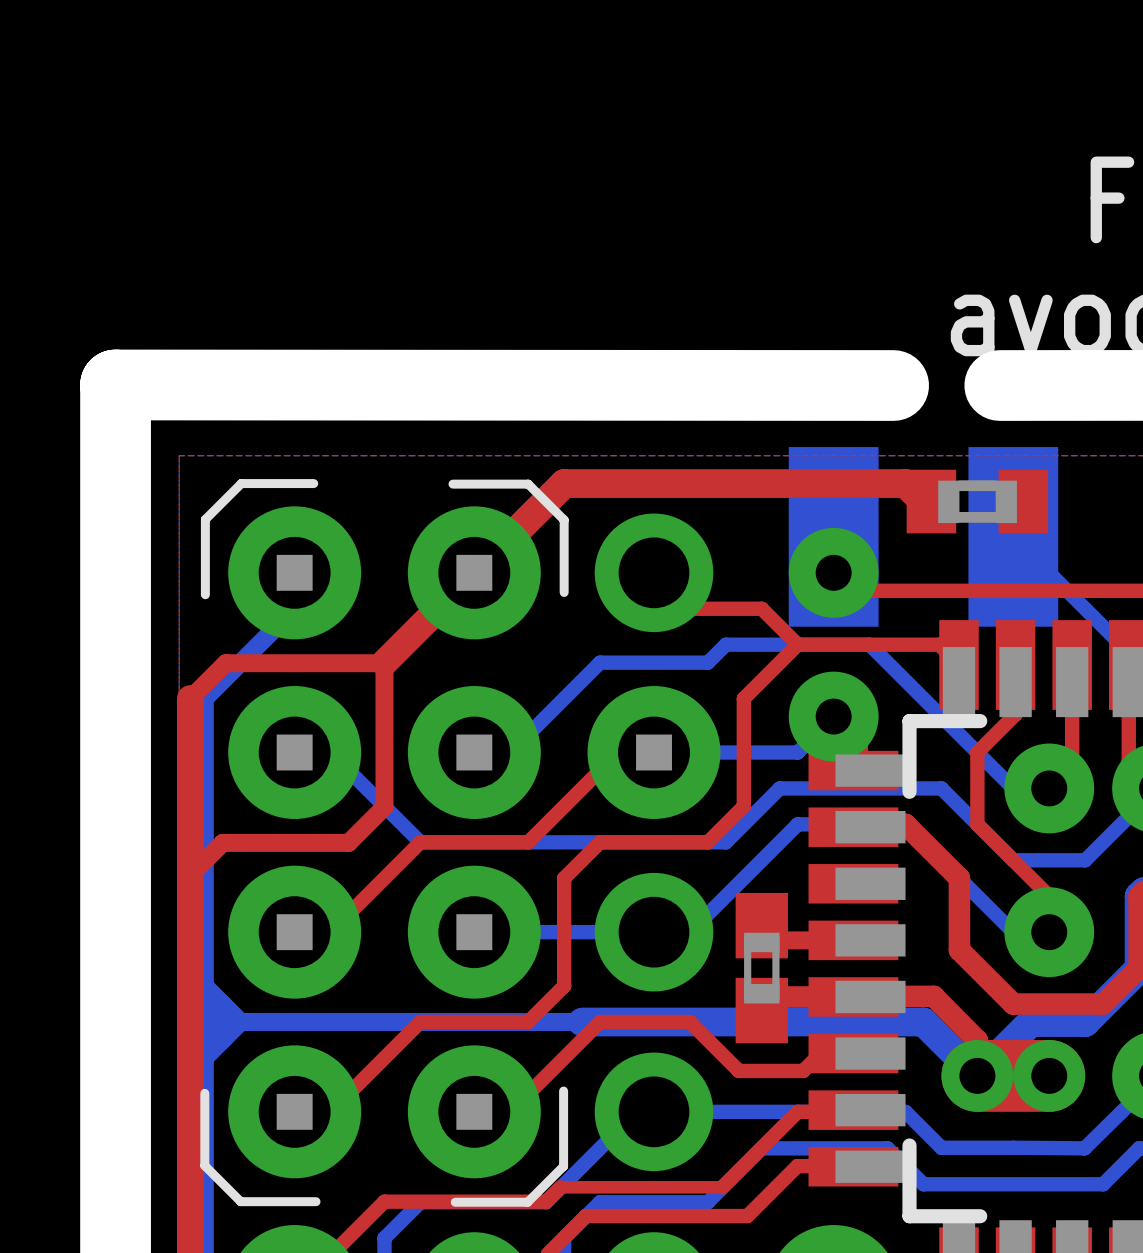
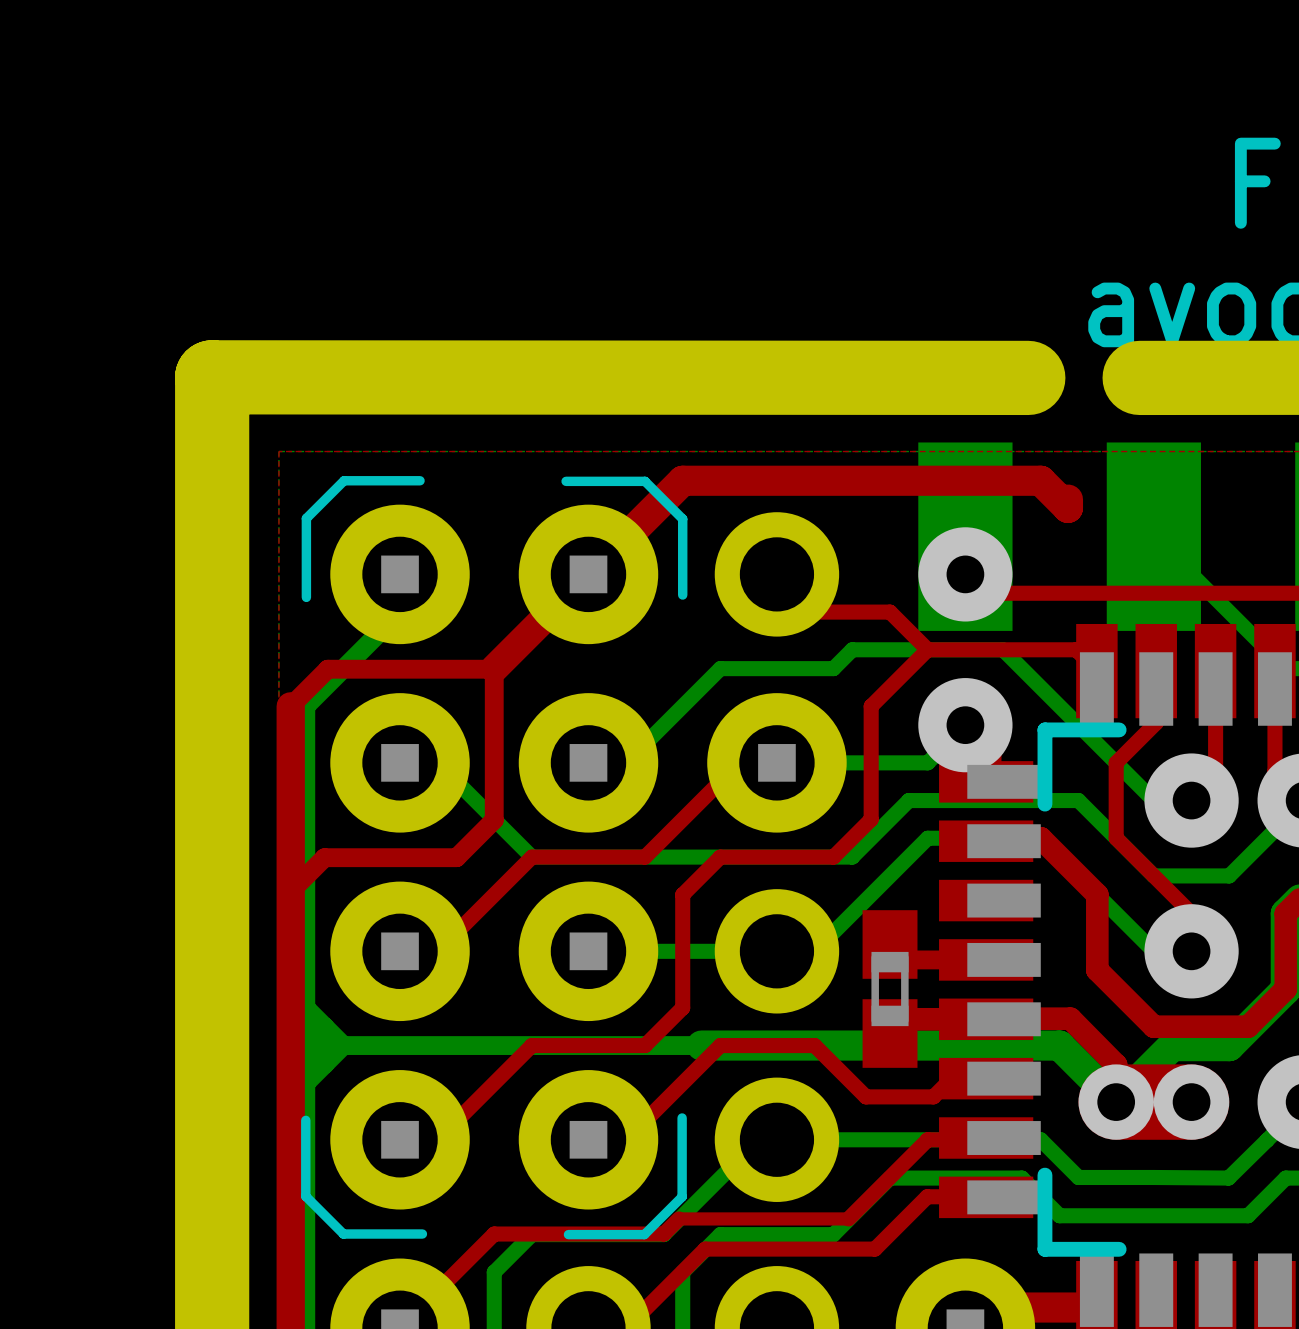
part: (977, 501) -> none

